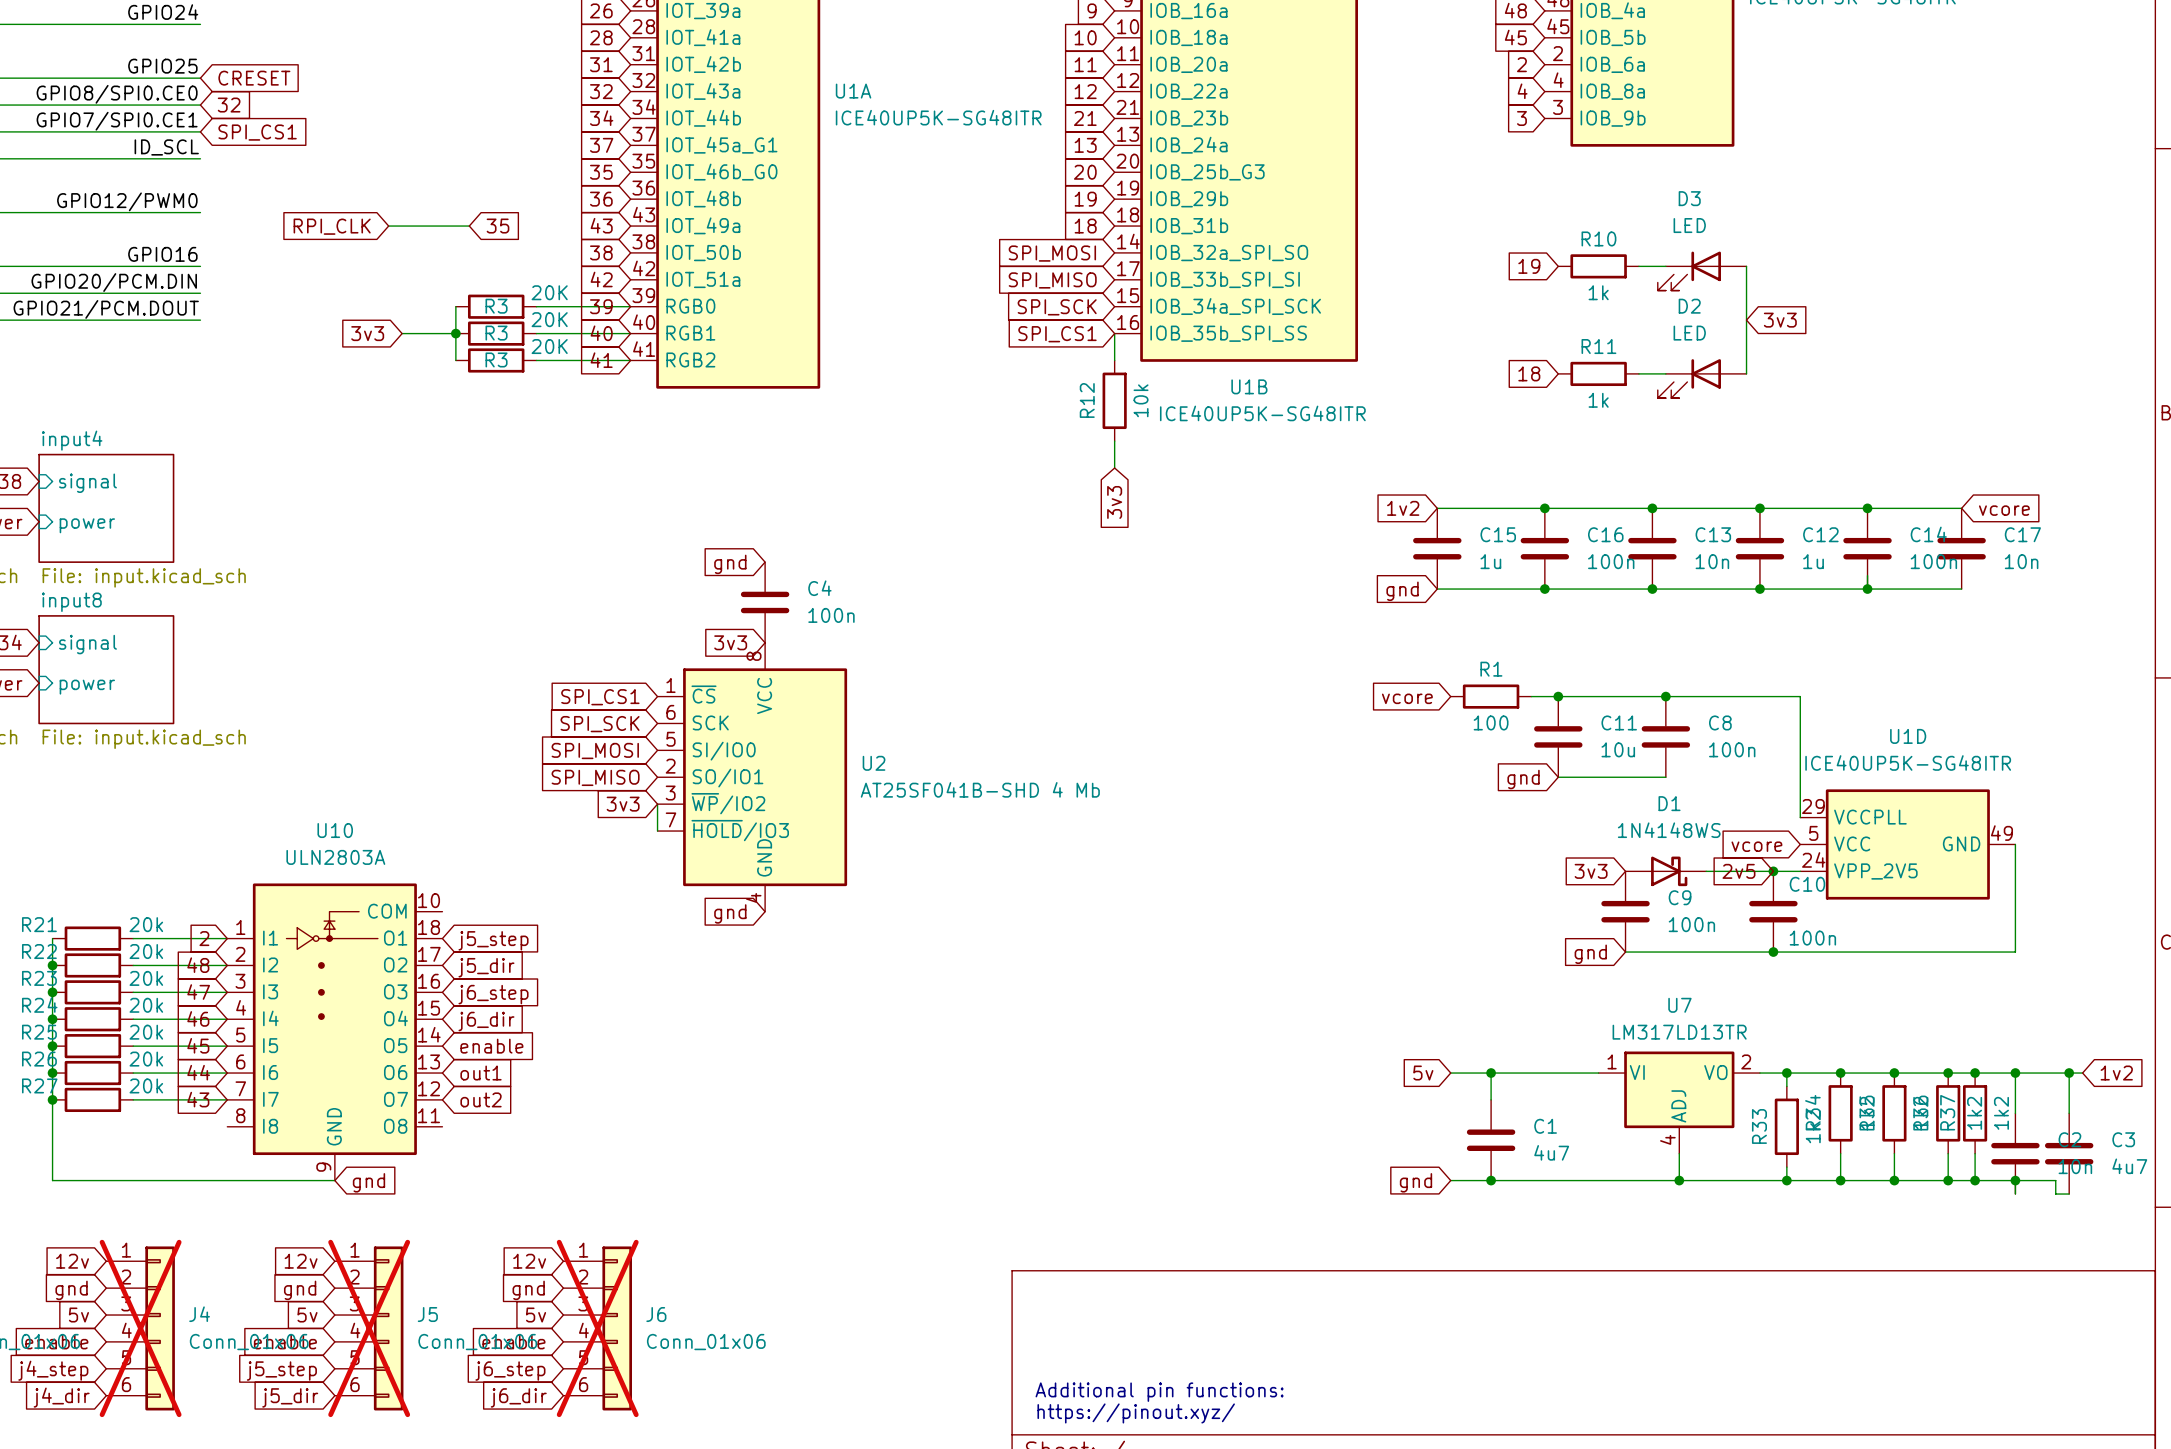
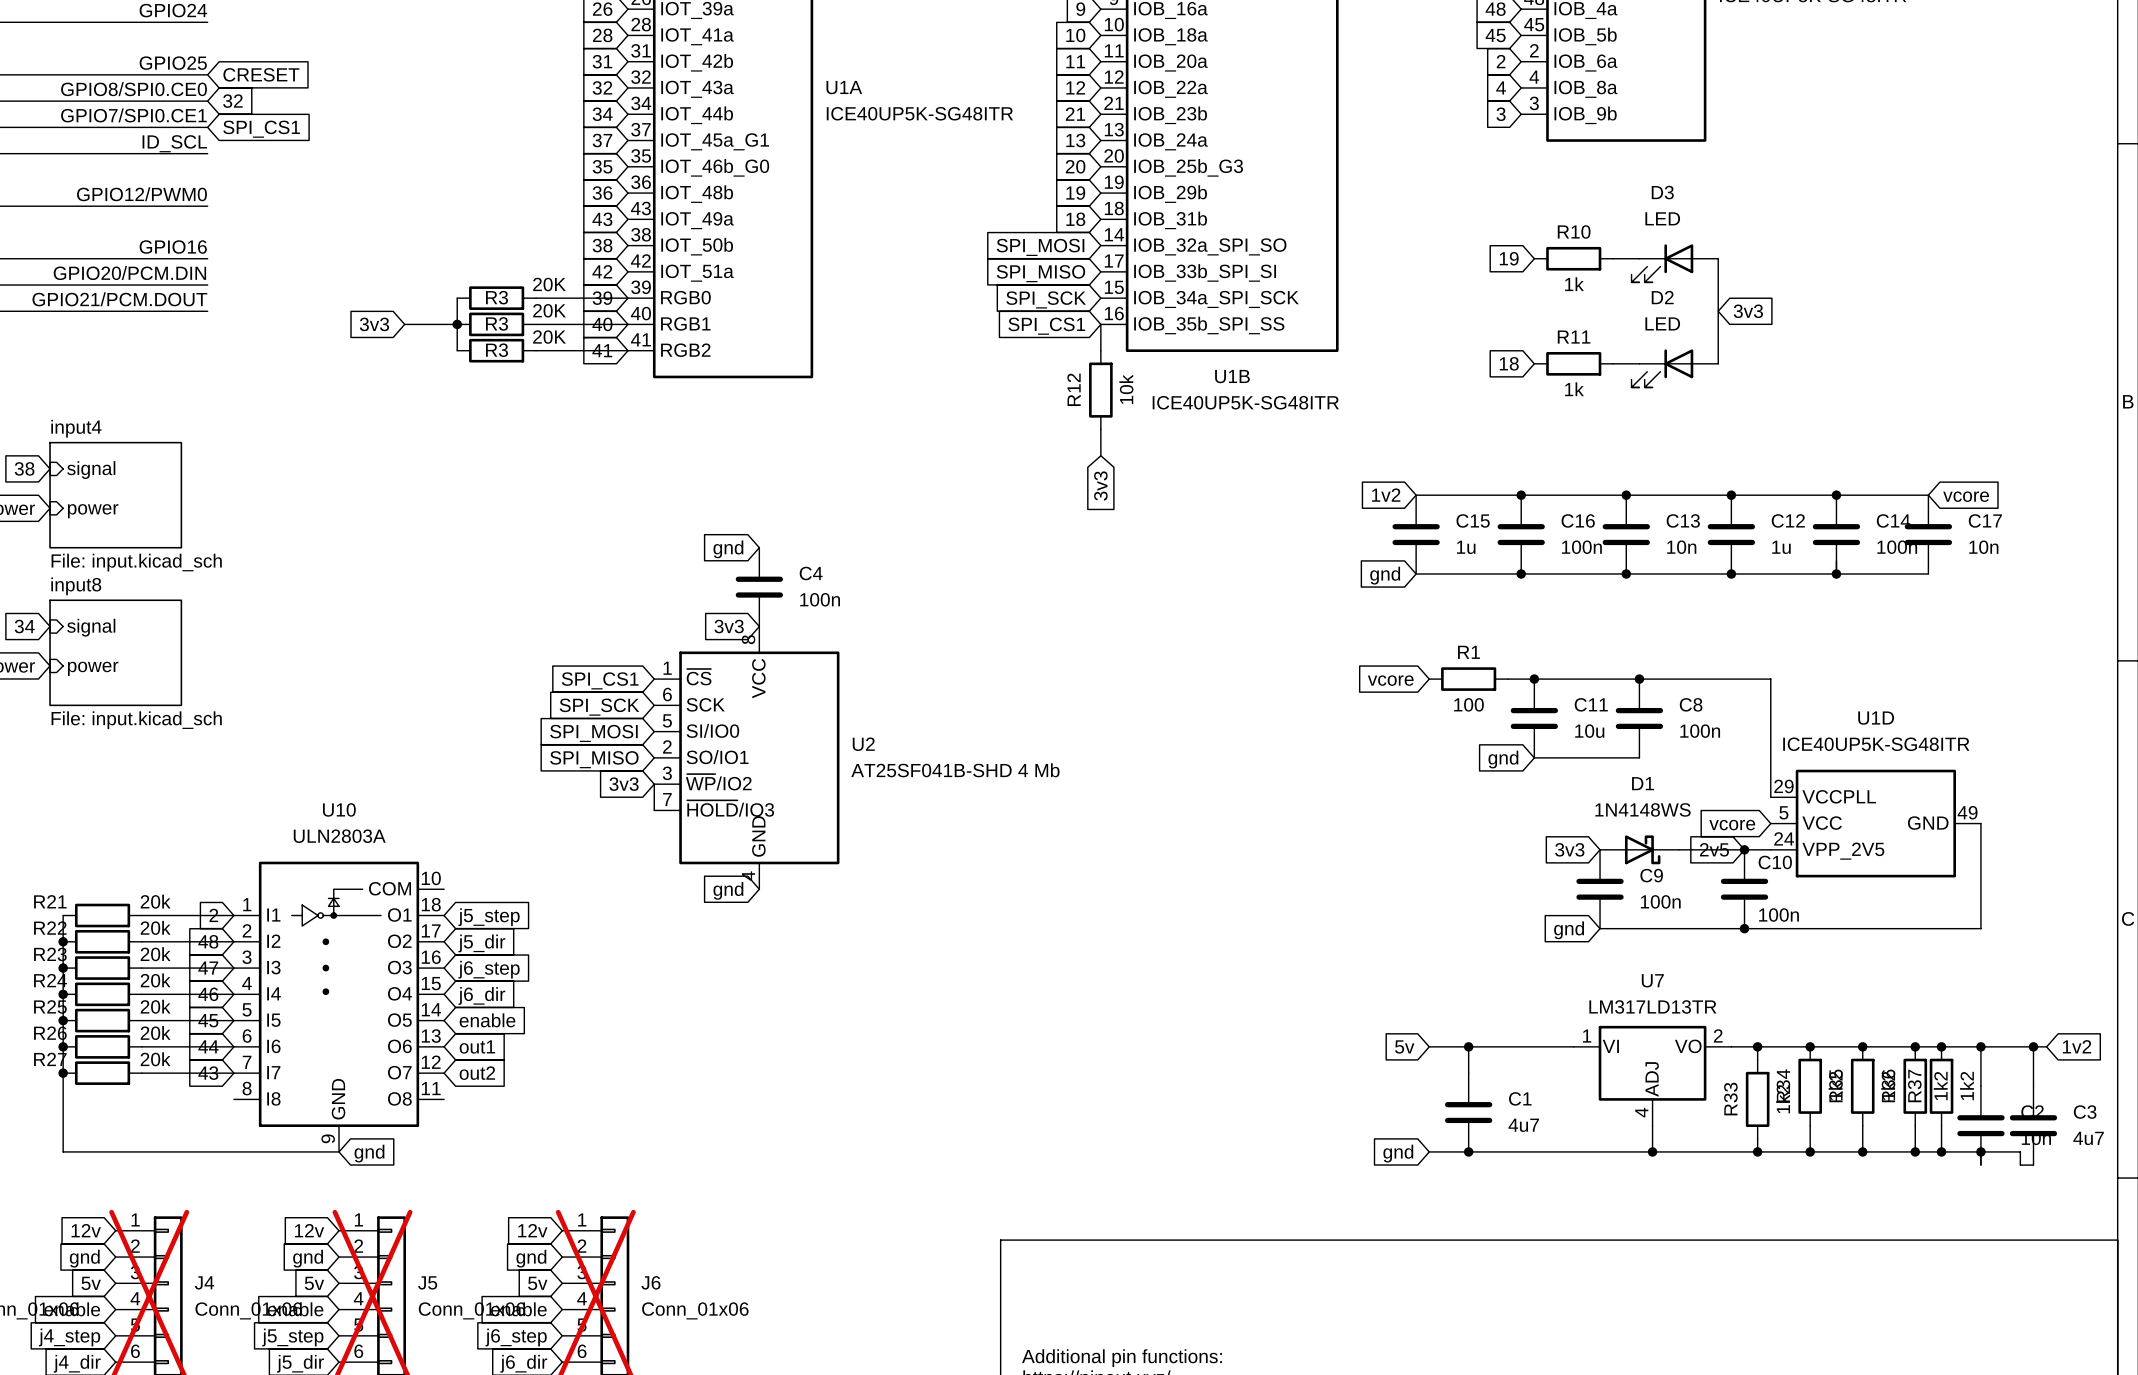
global label: RPI_CLK (332, 226) -> none
wire: (388, 226) (469, 226) -> none
global label: 35 (497, 226) -> none

